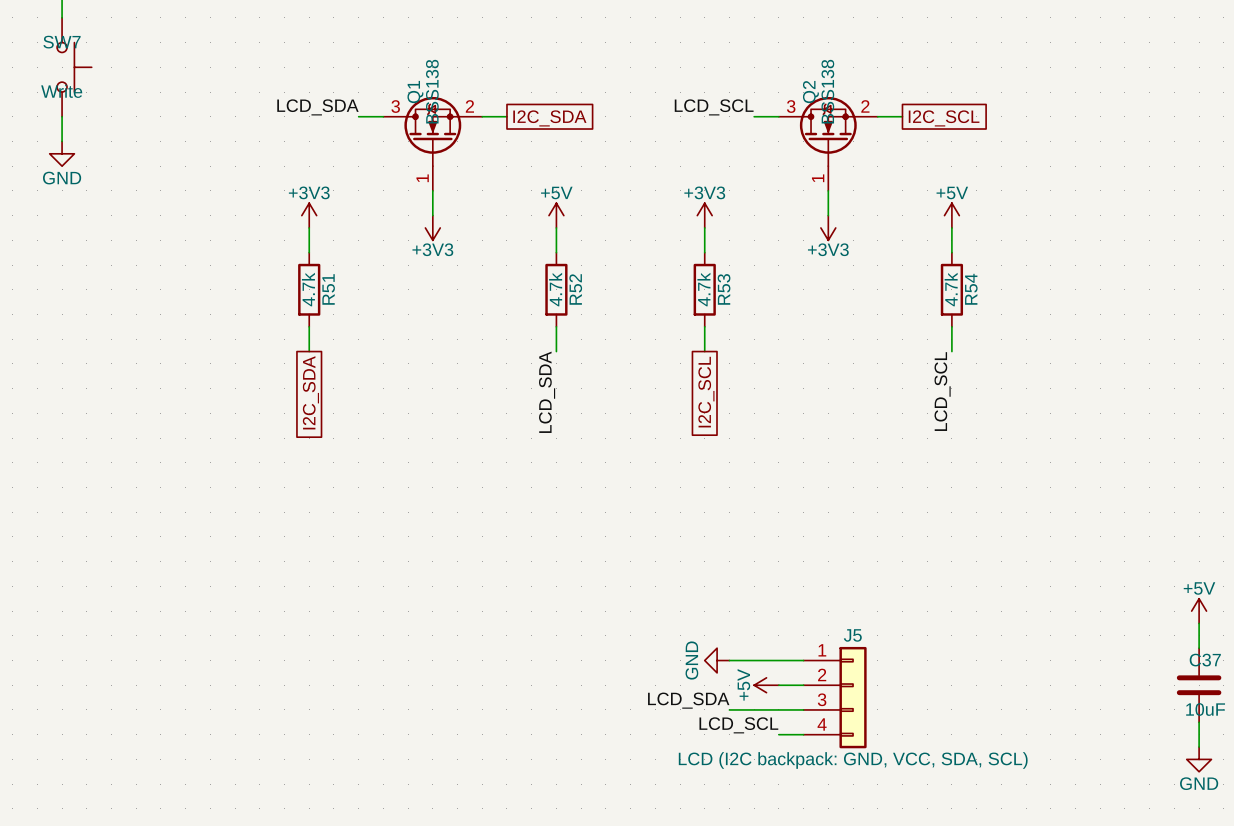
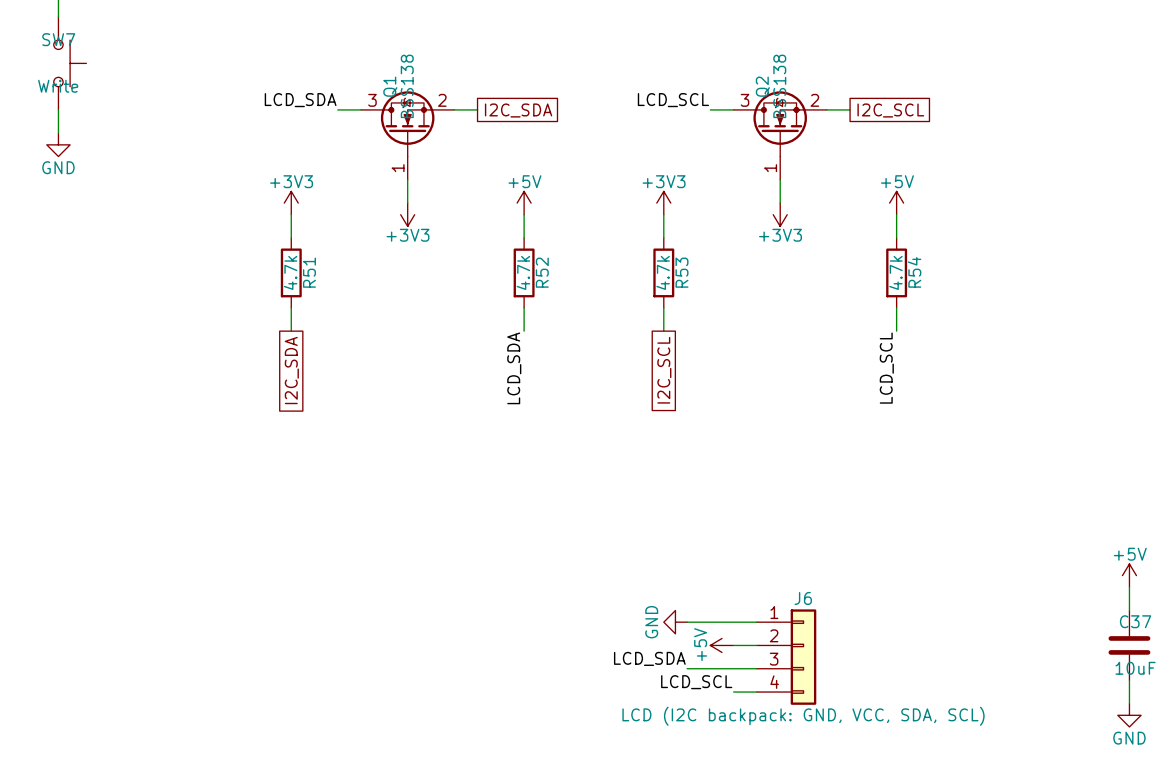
J5 name: J5 (852, 635) -> J6 (803, 598)

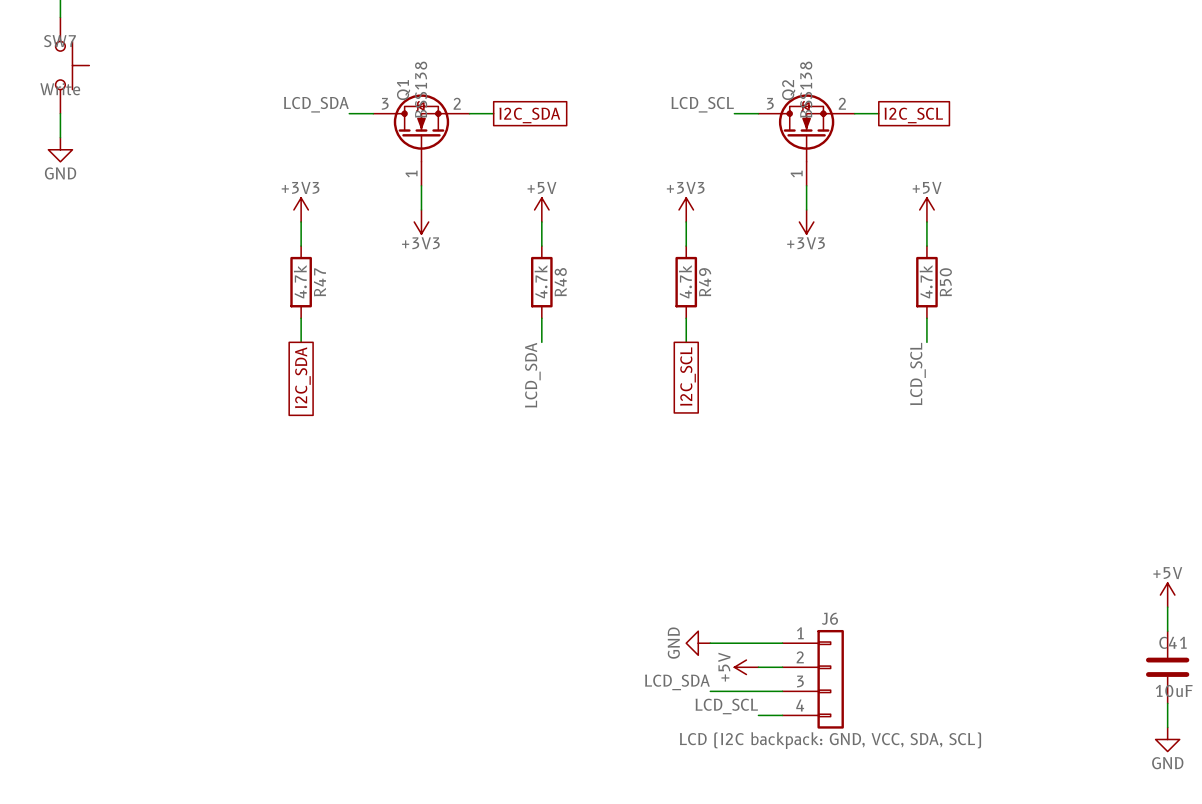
R51 name: R51 (309, 272) -> R47 (319, 282)
R52 name: R52 (542, 272) -> R48 (560, 282)
R53 name: R53 (681, 272) -> R49 (705, 282)
R54 name: R54 (914, 272) -> R50 (945, 282)
C37 name: C37 (1135, 621) -> C41 (1173, 642)

